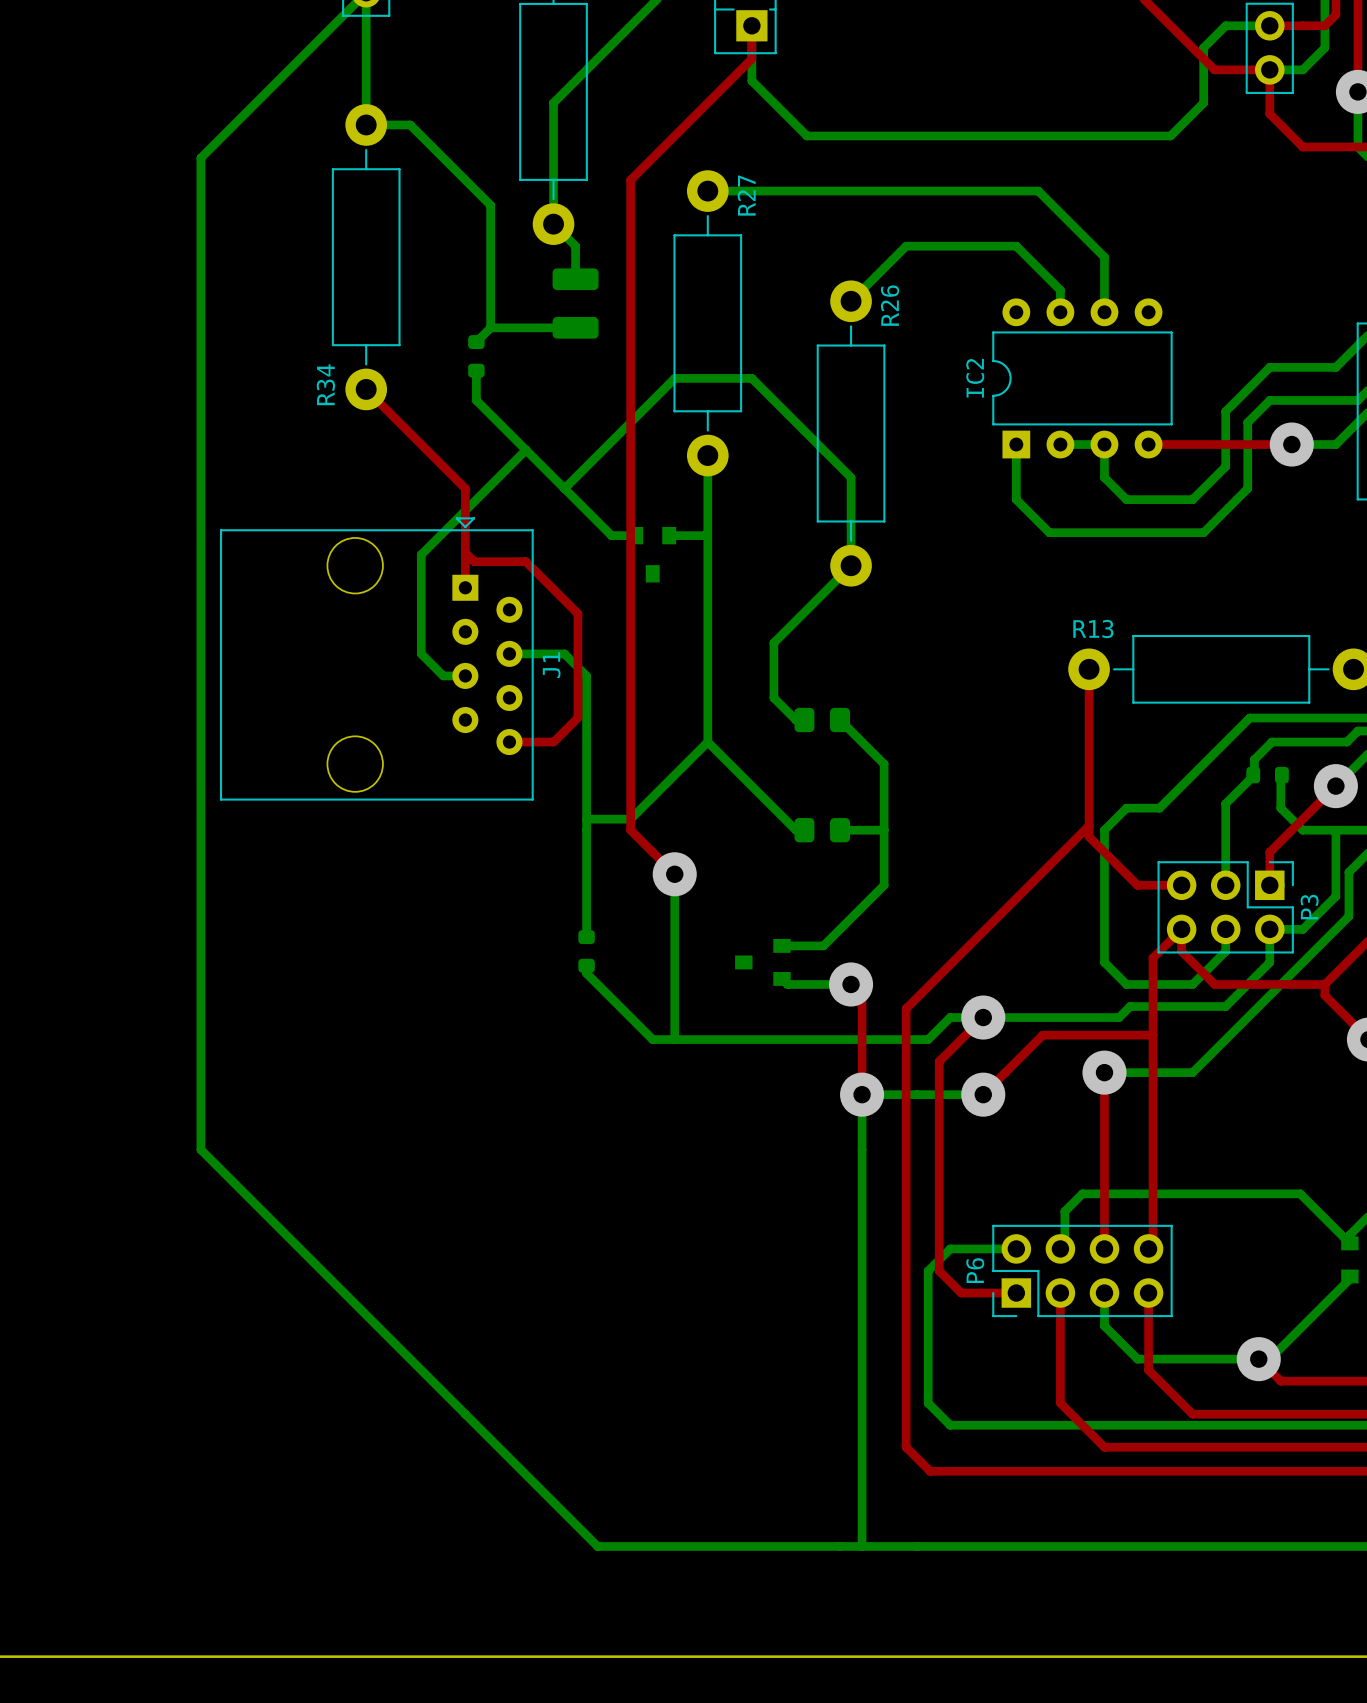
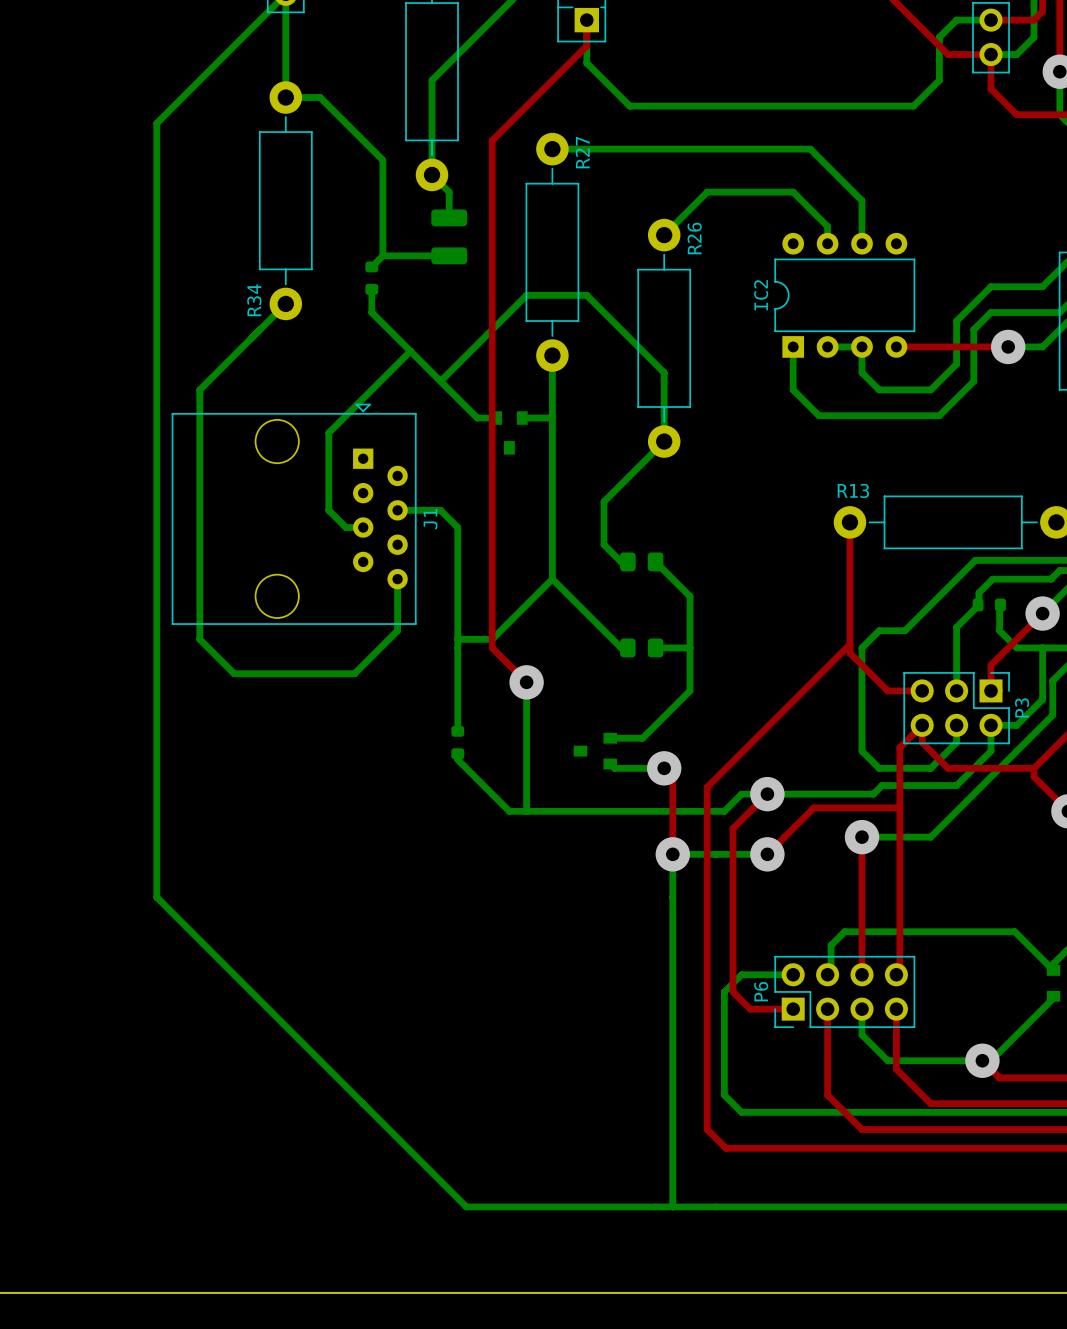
bottom track: none -> (285, 303) (199, 389) (199, 639) (234, 673) (354, 673) (397, 630) (397, 579)
top track: (366, 389) (465, 488) (465, 587) -> none
top track: (465, 552) (474, 561) (525, 561) (577, 613) (577, 717) (553, 742) (509, 742) -> none

